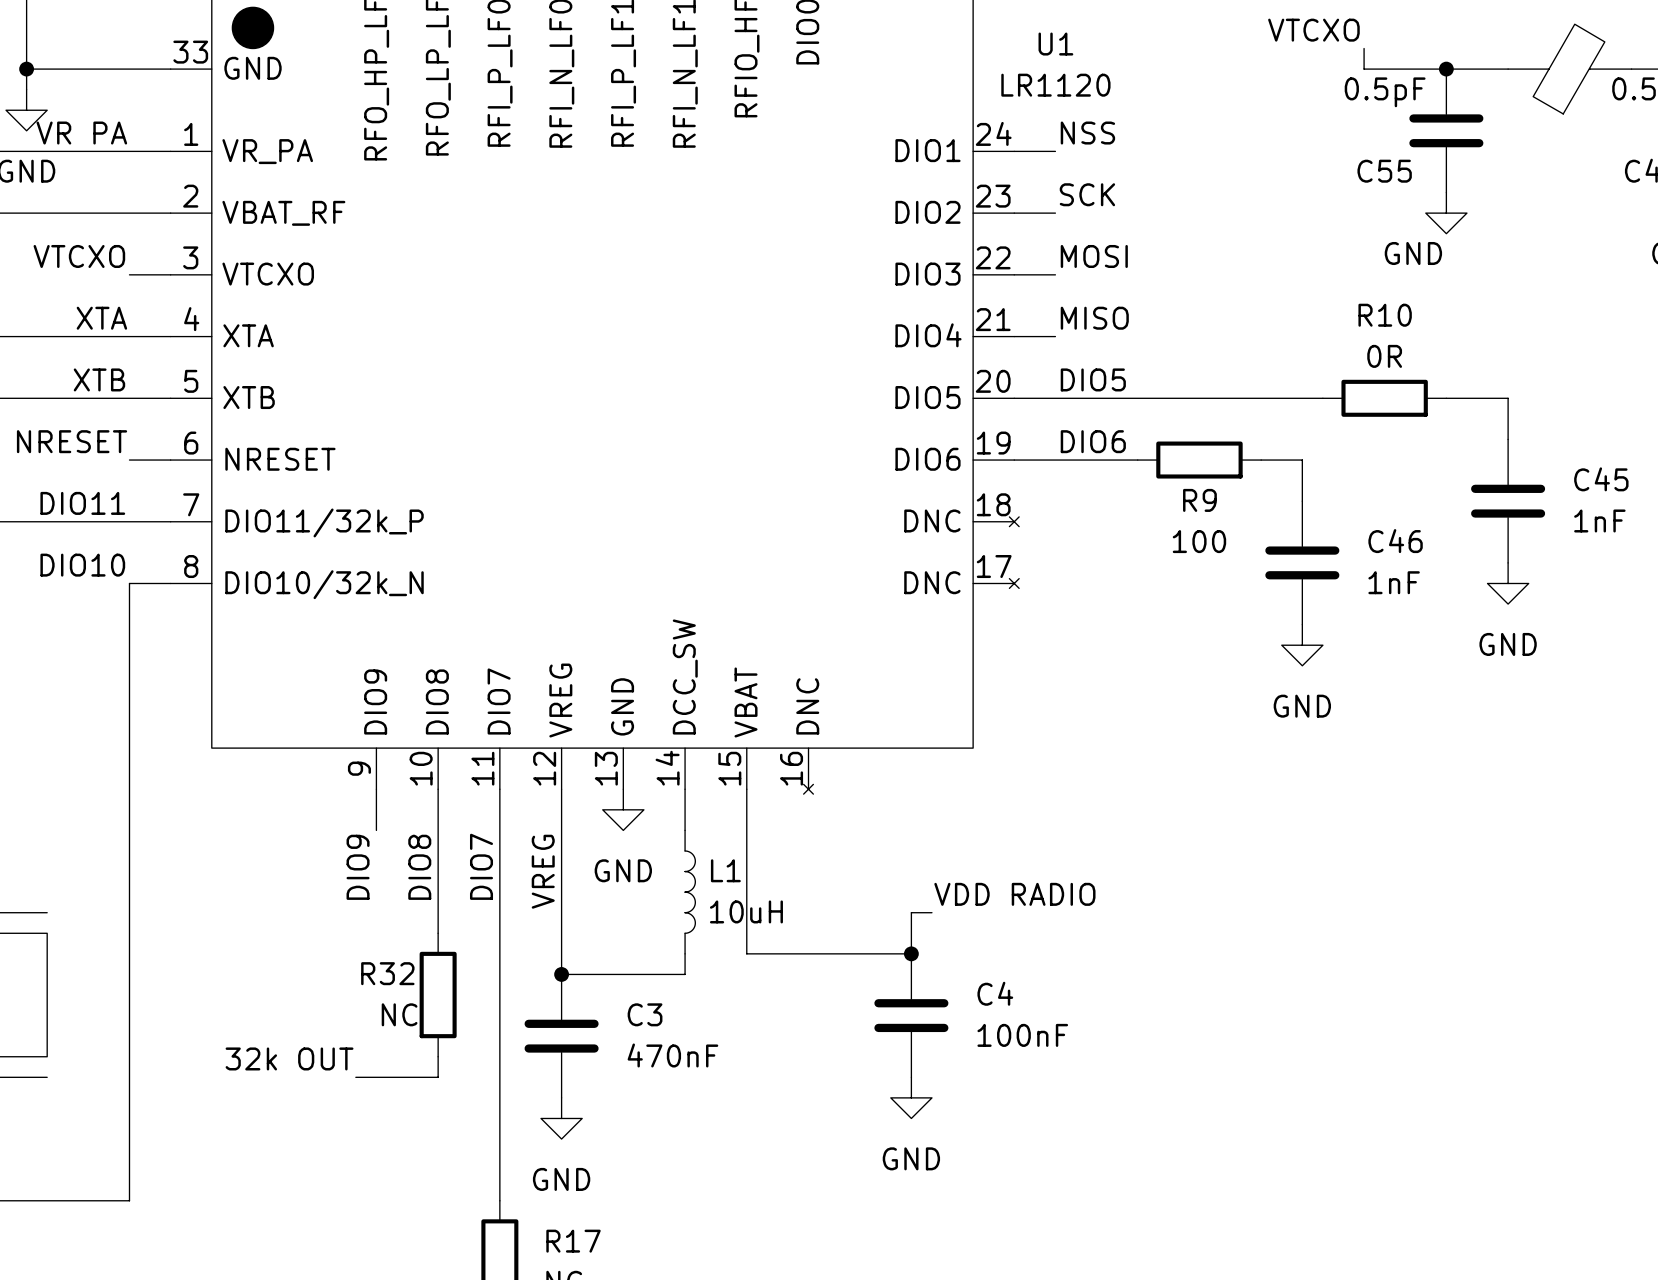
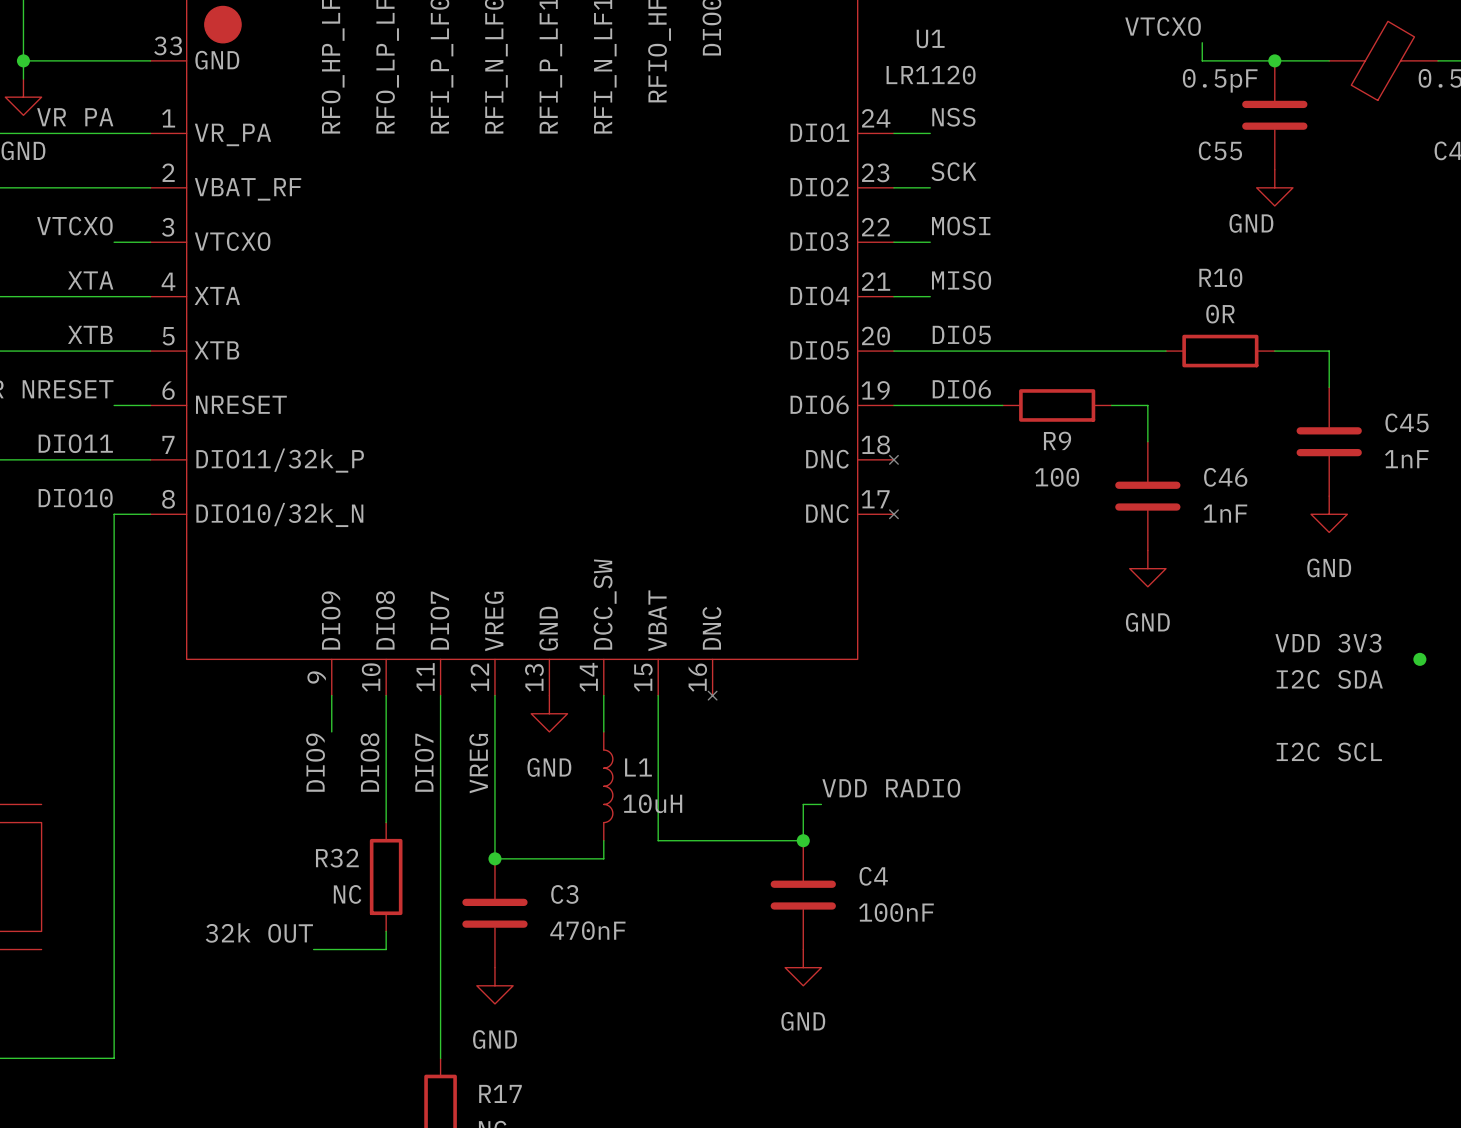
label: none -> VDD 3V3 (1328, 643)
junction: none -> (1419, 659)
label: none -> I2C SDA (1329, 679)
label: none -> I2C SCL (1329, 751)

